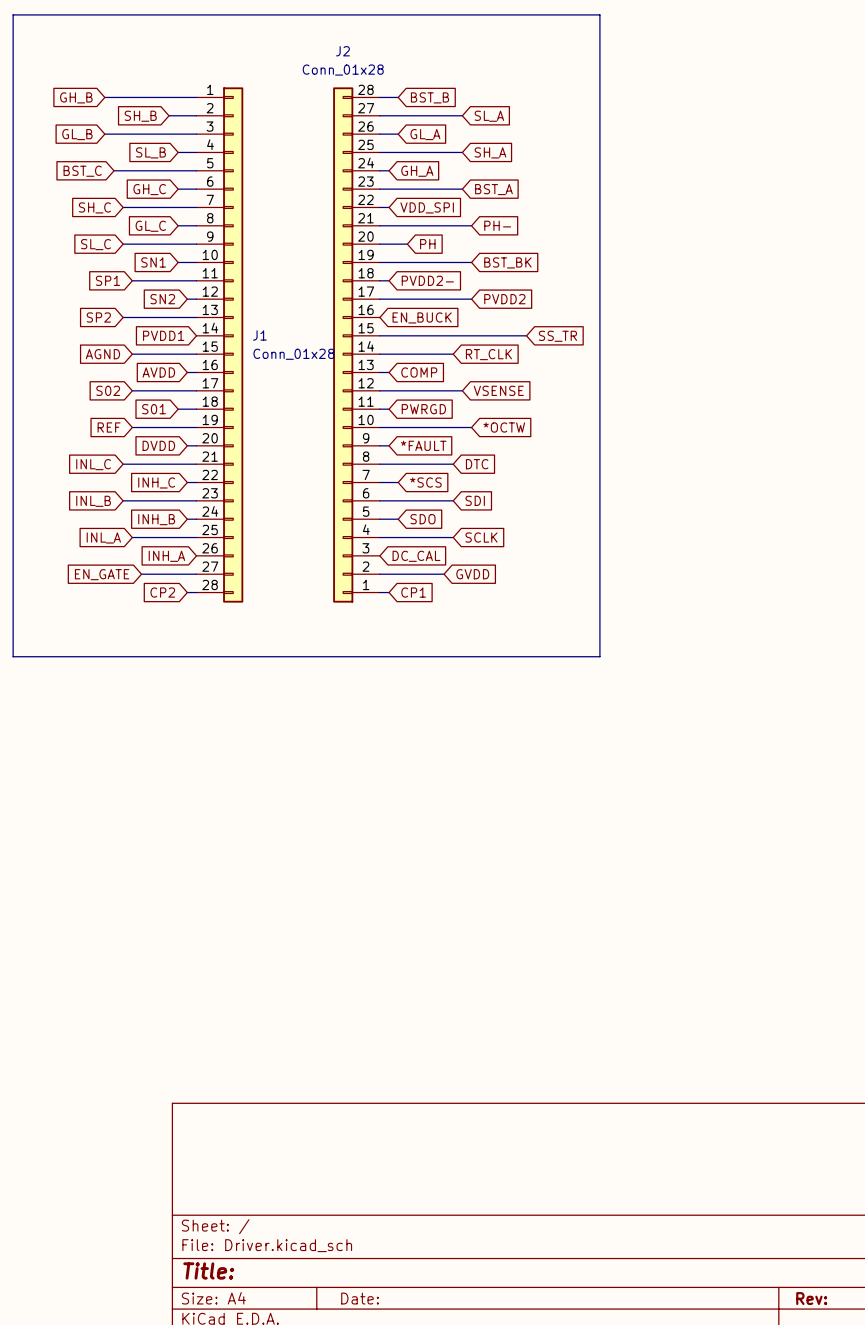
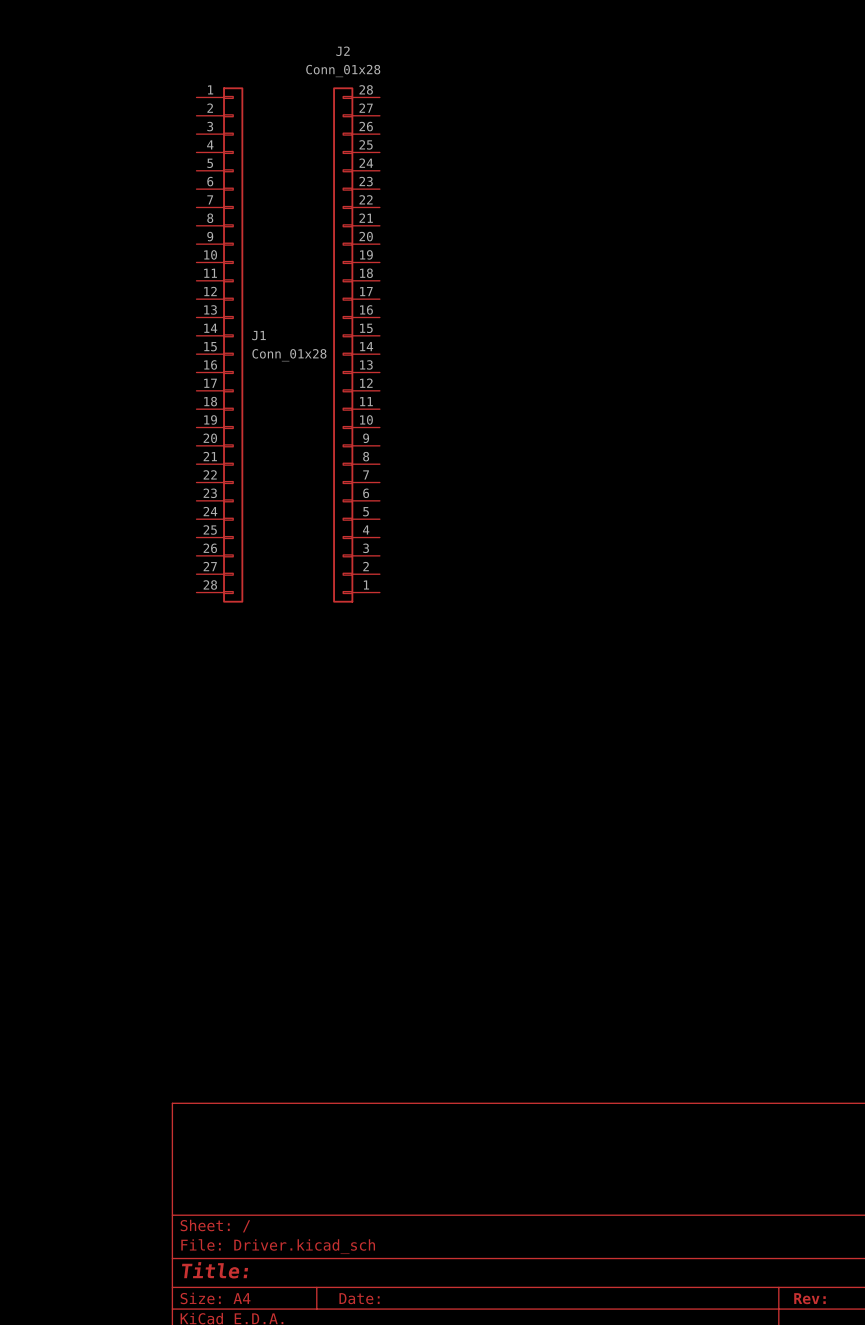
line: (13, 14) (599, 14) (599, 656) (13, 656) (13, 14) -> none
global label: GH_B (76, 97) -> none
wire: (104, 97) (196, 97) -> none
wire: (379, 97) (398, 97) -> none
global label: BST_B (429, 97) -> none
wire: (169, 115) (196, 115) -> none
wire: (379, 115) (462, 115) -> none
global label: SH_B (140, 116) -> none
global label: SL_A (489, 116) -> none
global label: GL_B (77, 134) -> none
wire: (104, 134) (196, 134) -> none
wire: (379, 134) (398, 134) -> none
global label: GL_A (425, 134) -> none
global label: SL_B (150, 152) -> none
wire: (178, 152) (196, 152) -> none
wire: (379, 152) (462, 152) -> none
global label: SH_A (490, 152) -> none
wire: (113, 170) (196, 170) -> none
wire: (379, 170) (389, 170) -> none
global label: BST_C (82, 171) -> none
global label: GH_A (417, 171) -> none
global label: GH_C (149, 189) -> none
wire: (178, 189) (196, 189) -> none
wire: (379, 189) (462, 189) -> none
global label: BST_A (493, 189) -> none
global label: SH_C (94, 207) -> none
wire: (123, 207) (196, 207) -> none
wire: (379, 207) (389, 207) -> none
global label: VDD_SPI (427, 207) -> none
wire: (178, 225) (196, 225) -> none
wire: (379, 225) (471, 225) -> none
global label: PH- (497, 225) -> none
global label: GL_C (150, 226) -> none
global label: SL_C (95, 244) -> none
wire: (123, 244) (196, 244) -> none
wire: (379, 244) (407, 244) -> none
global label: PH (427, 244) -> none
global label: SN1 (153, 262) -> none
wire: (178, 262) (196, 262) -> none
wire: (379, 262) (471, 262) -> none
global label: BST_BK (507, 262) -> none
global label: SP1 (107, 280) -> none
wire: (132, 280) (196, 280) -> none
wire: (379, 280) (389, 280) -> none
global label: PVDD2- (427, 280) -> none
global label: SN2 (162, 299) -> none
wire: (187, 299) (196, 299) -> none
wire: (379, 299) (471, 299) -> none
global label: PVDD2 (504, 299) -> none
global label: SP2 (98, 317) -> none
wire: (123, 317) (196, 317) -> none
global label: EN_BUCK (422, 317) -> none
global label: PVDD1 (163, 335) -> none
wire: (379, 335) (526, 335) -> none
global label: SS_TR (557, 336) -> none
global label: AGND (102, 354) -> none
wire: (132, 354) (196, 354) -> none
wire: (379, 354) (453, 354) -> none
global label: RT_CLK (488, 354) -> none
global label: AVDD (158, 372) -> none
wire: (187, 372) (196, 372) -> none
wire: (379, 372) (389, 372) -> none
global label: COMP (419, 372) -> none
global label: S02 (108, 390) -> none
wire: (132, 390) (196, 390) -> none
wire: (379, 390) (462, 390) -> none
global label: VSENSE (498, 390) -> none
global label: S01 (154, 409) -> none
wire: (178, 409) (196, 409) -> none
wire: (379, 409) (389, 409) -> none
global label: PWRGD (423, 409) -> none
global label: REF (109, 427) -> none
wire: (132, 427) (196, 427) -> none
wire: (379, 427) (471, 427) -> none
global label: *OCTW (504, 427) -> none
global label: DVDD (158, 445) -> none
wire: (187, 445) (196, 445) -> none
wire: (379, 445) (389, 445) -> none
global label: *FAULT (423, 445) -> none
global label: INL_C (93, 464) -> none
wire: (123, 464) (196, 464) -> none
wire: (379, 464) (453, 464) -> none
global label: DTC (477, 464) -> none
global label: INH_C (156, 482) -> none
wire: (187, 482) (196, 482) -> none
wire: (379, 482) (398, 482) -> none
global label: *SCS (425, 482) -> none
wire: (123, 500) (196, 500) -> none
wire: (379, 500) (453, 500) -> none
global label: SDI (475, 500) -> none
global label: INL_B (93, 501) -> none
global label: INH_B (156, 519) -> none
wire: (187, 519) (196, 519) -> none
wire: (379, 519) (398, 519) -> none
global label: SDO (423, 519) -> none
global label: INL_A (103, 537) -> none
wire: (132, 537) (196, 537) -> none
wire: (379, 537) (453, 537) -> none
global label: SCLK (481, 537) -> none
global label: INH_A (166, 556) -> none
global label: DC_CAL (416, 556) -> none
global label: EN_GATE (102, 574) -> none
wire: (141, 574) (196, 574) -> none
wire: (379, 574) (444, 574) -> none
global label: GVDD (472, 574) -> none
global label: CP2 (162, 592) -> none
wire: (187, 592) (196, 592) -> none
wire: (379, 592) (389, 592) -> none
global label: CP1 (413, 592) -> none

